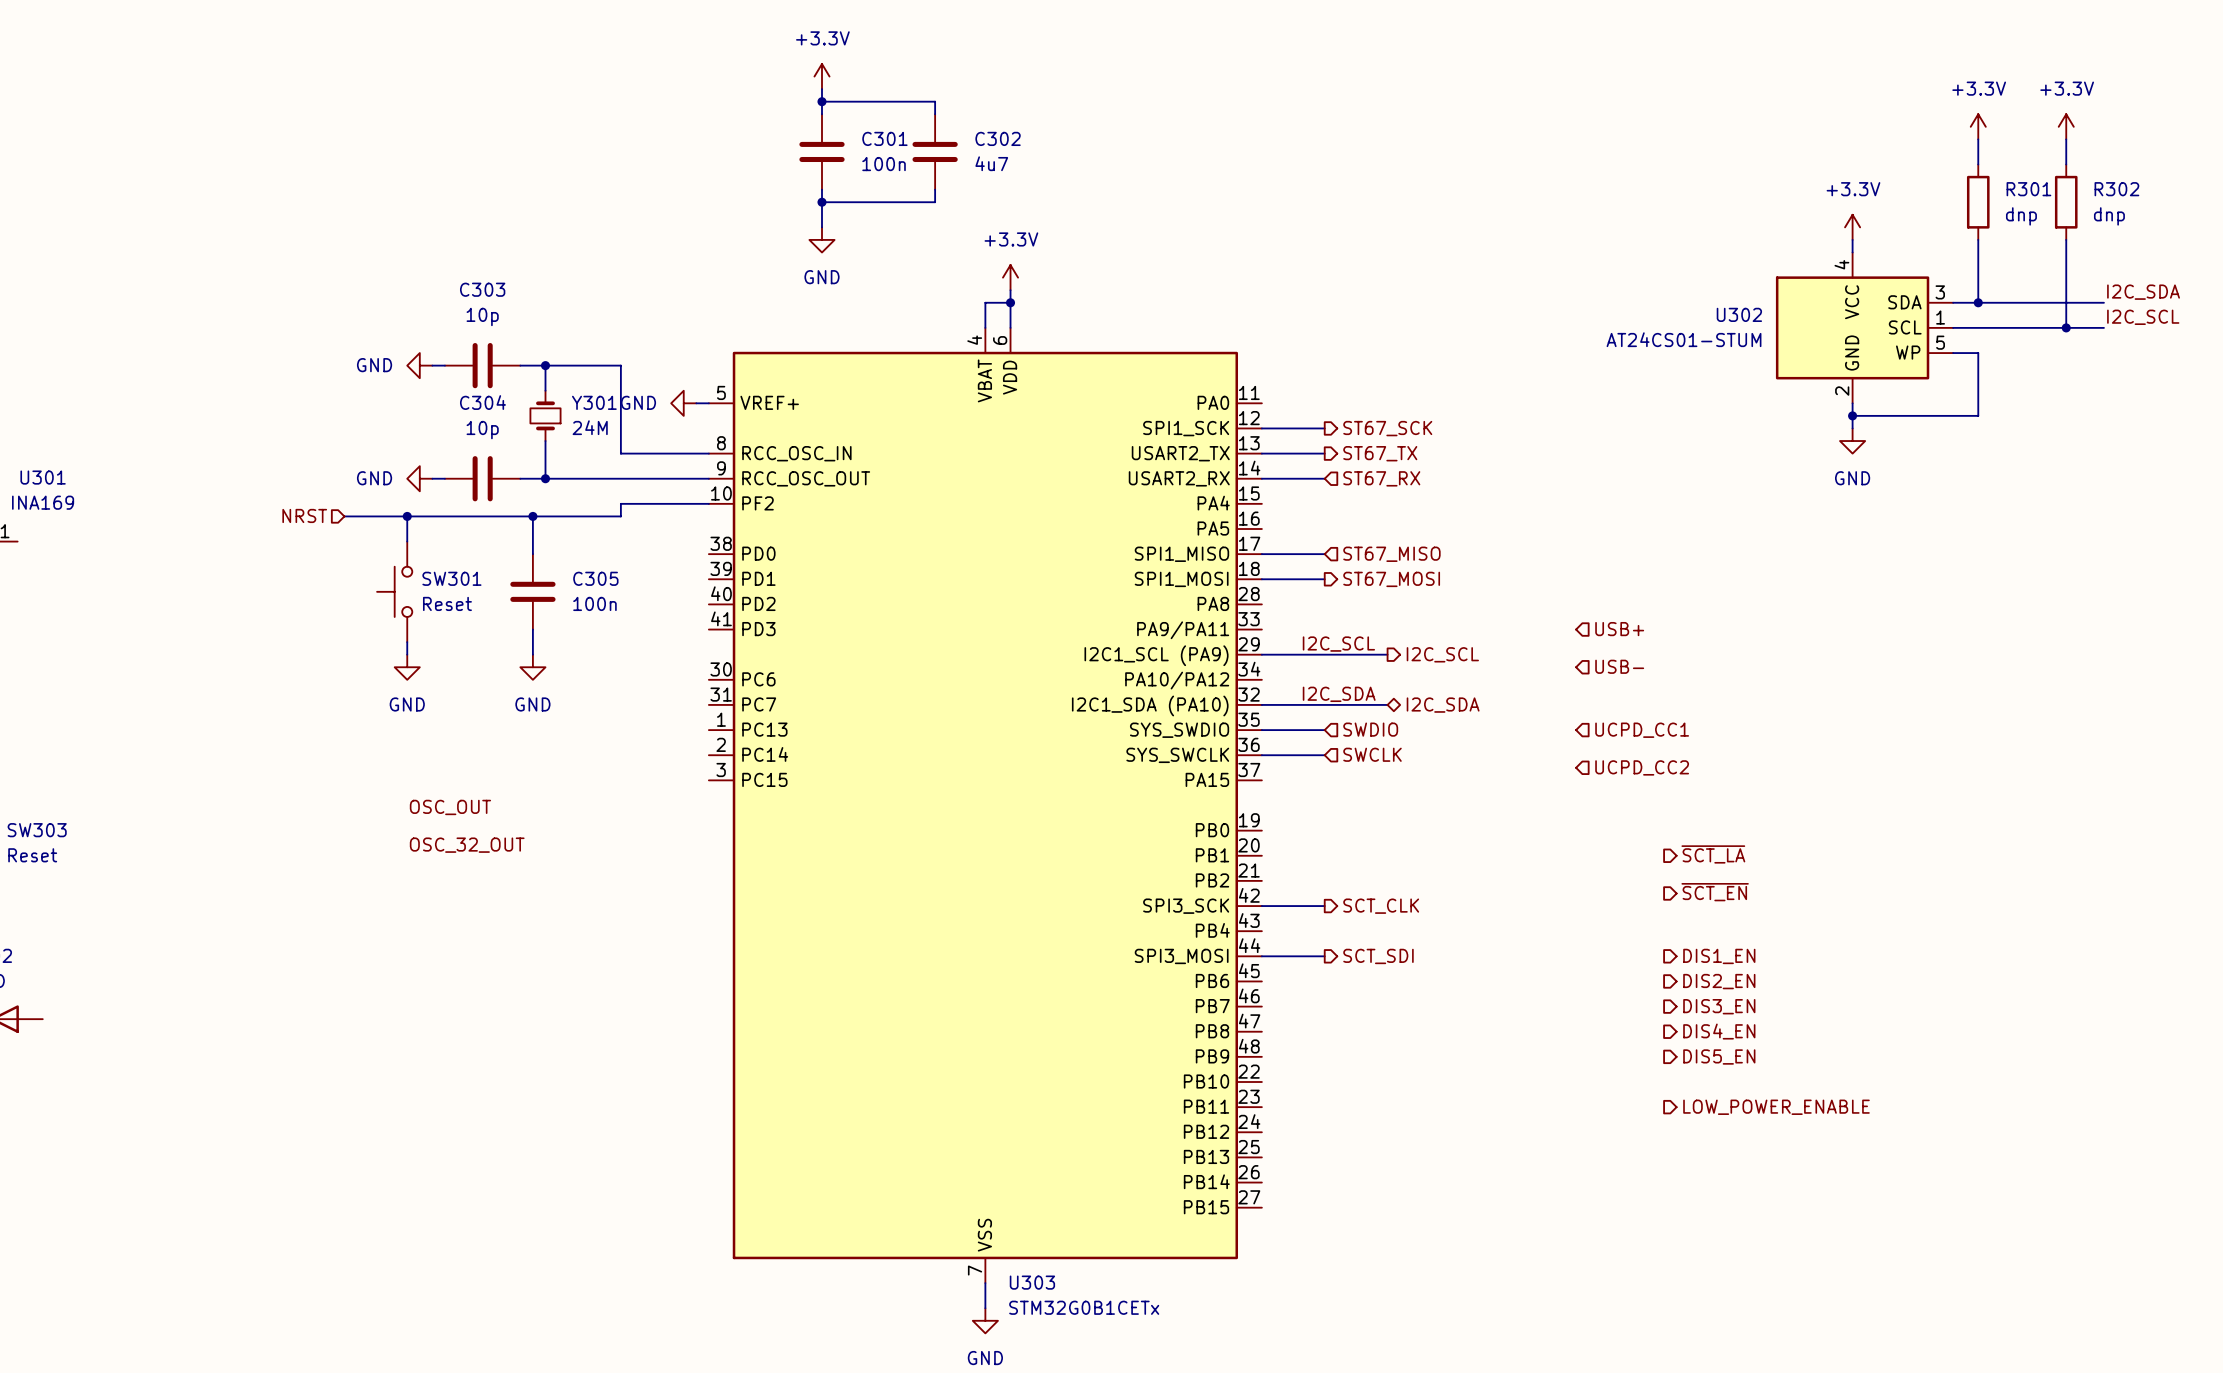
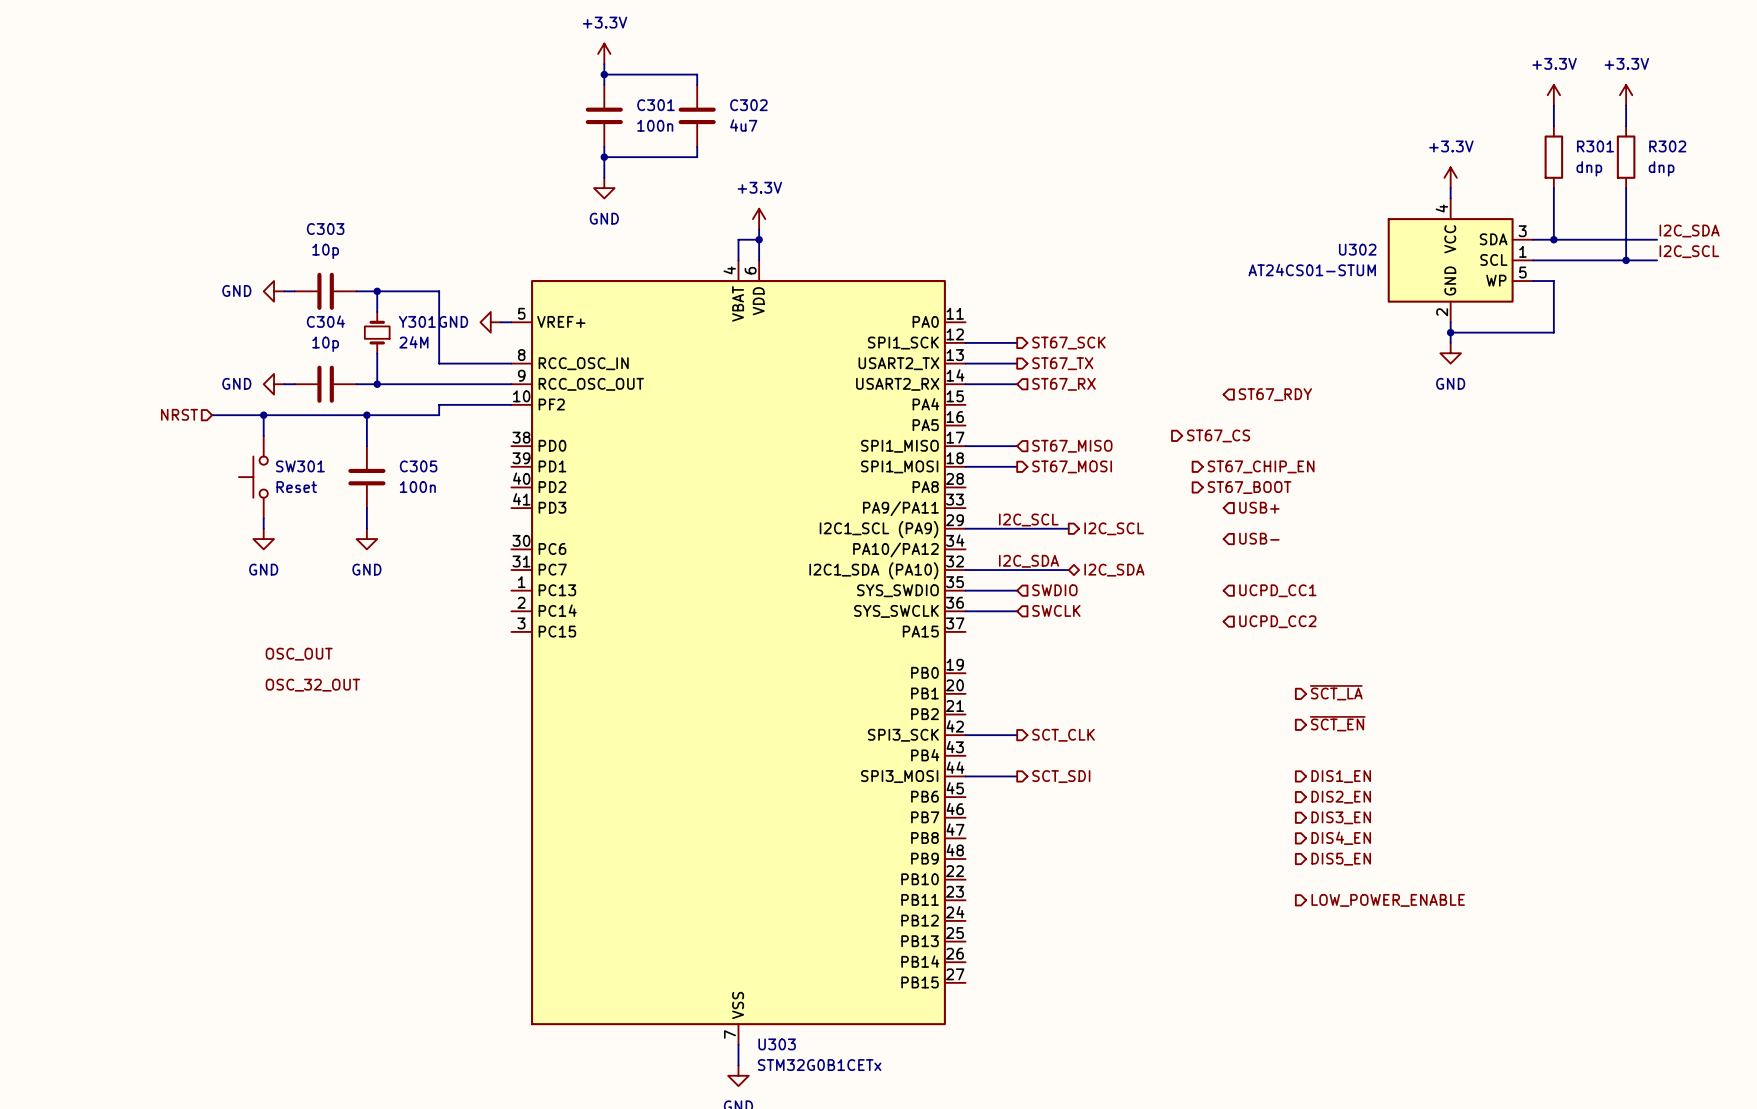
hierarchical label: none -> ST67_RDY (1275, 394)
hierarchical label: none -> ST67_CS (1218, 435)
hierarchical label: none -> ST67_CHIP_EN (1261, 466)
hierarchical label: none -> ST67_BOOT (1249, 487)

